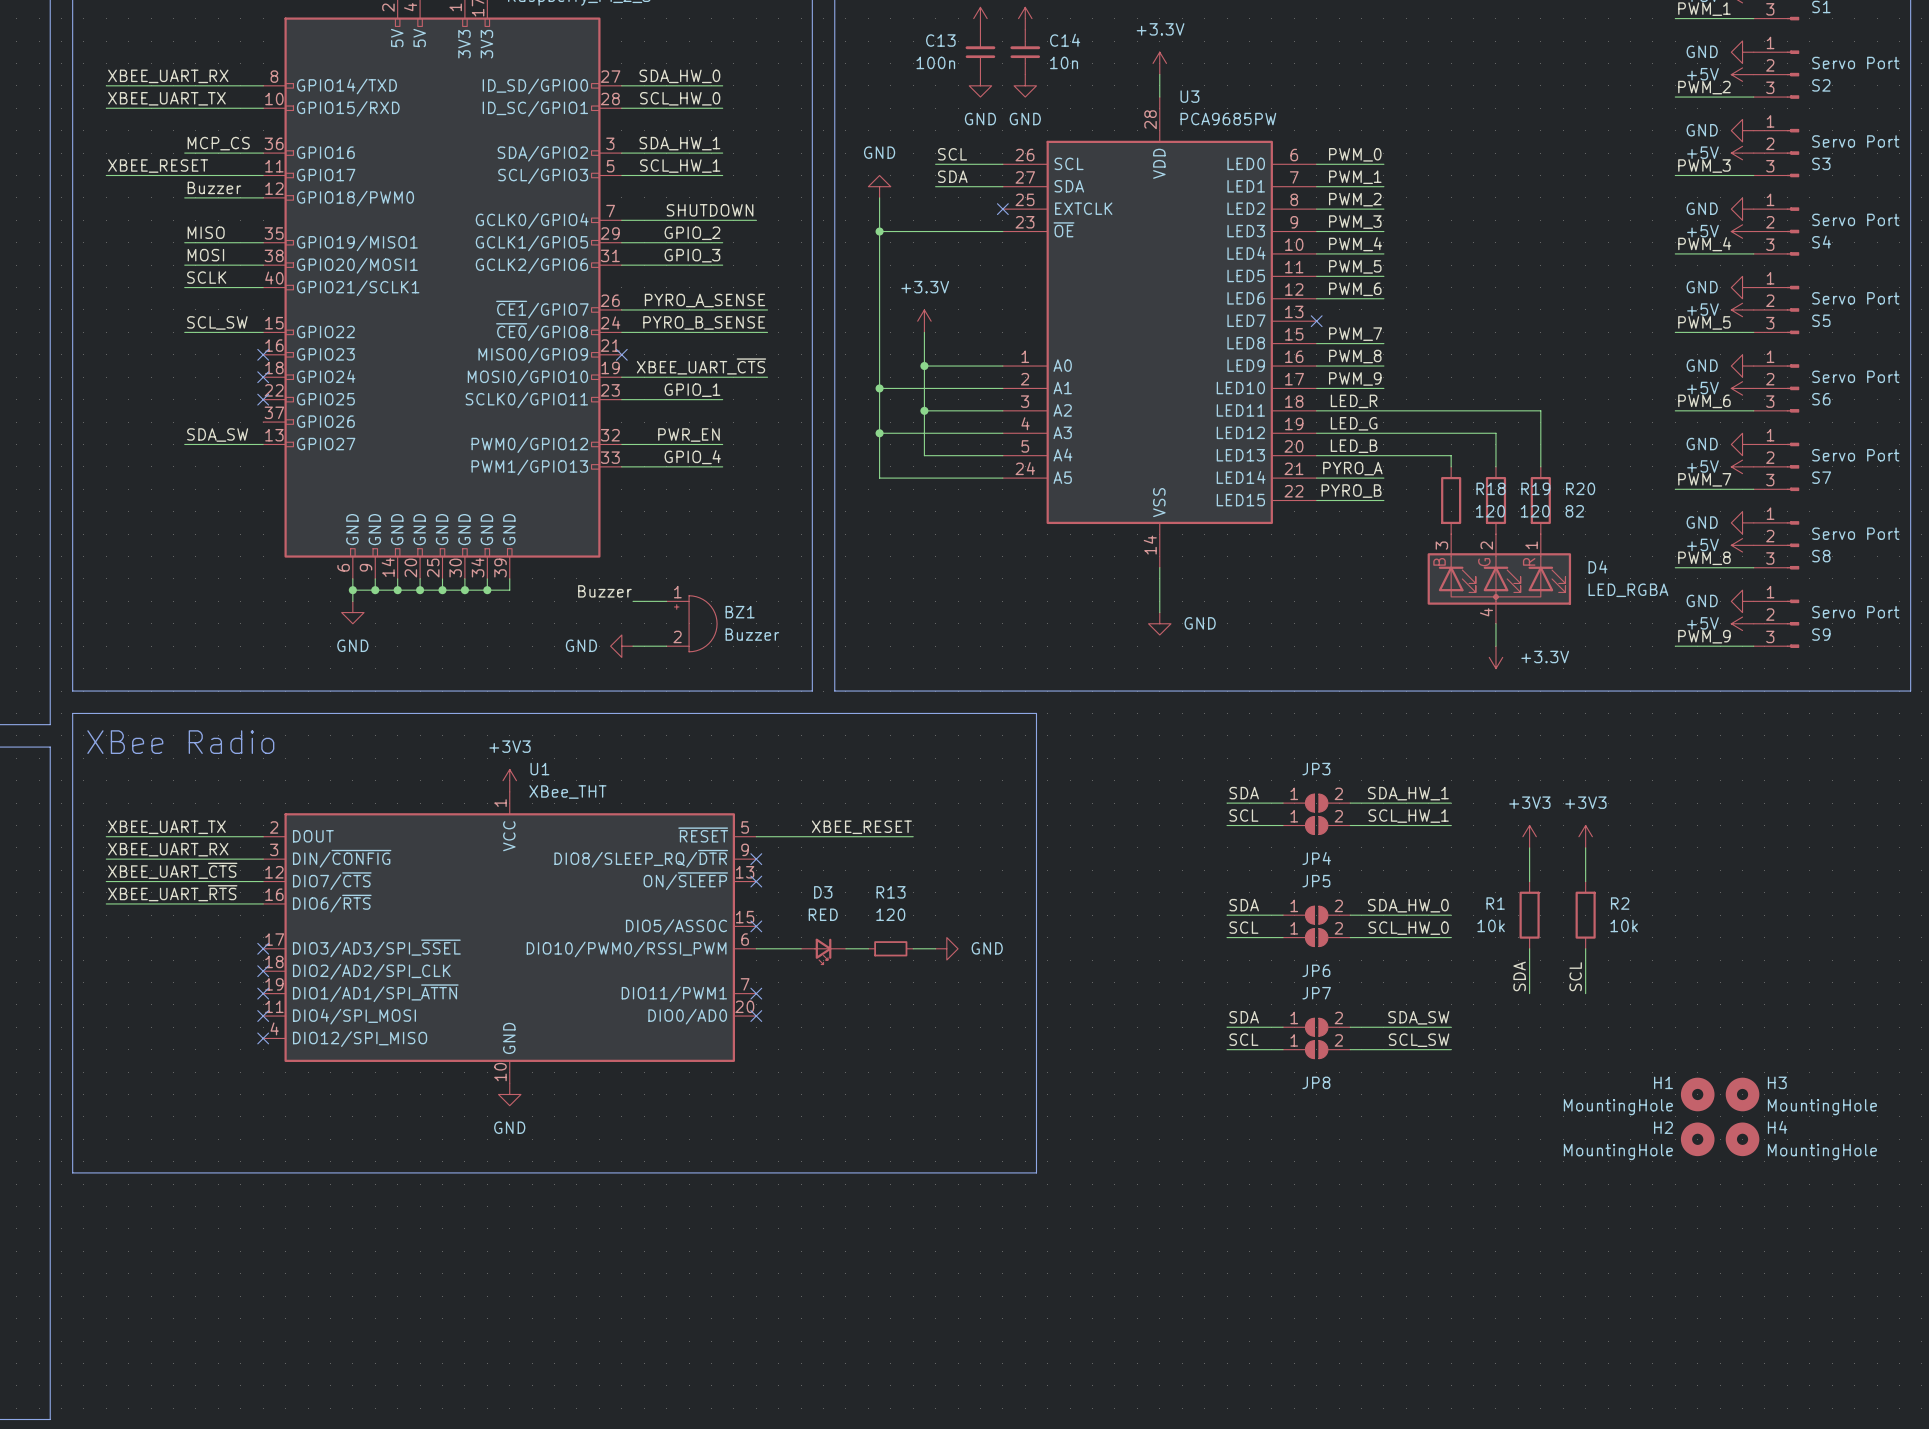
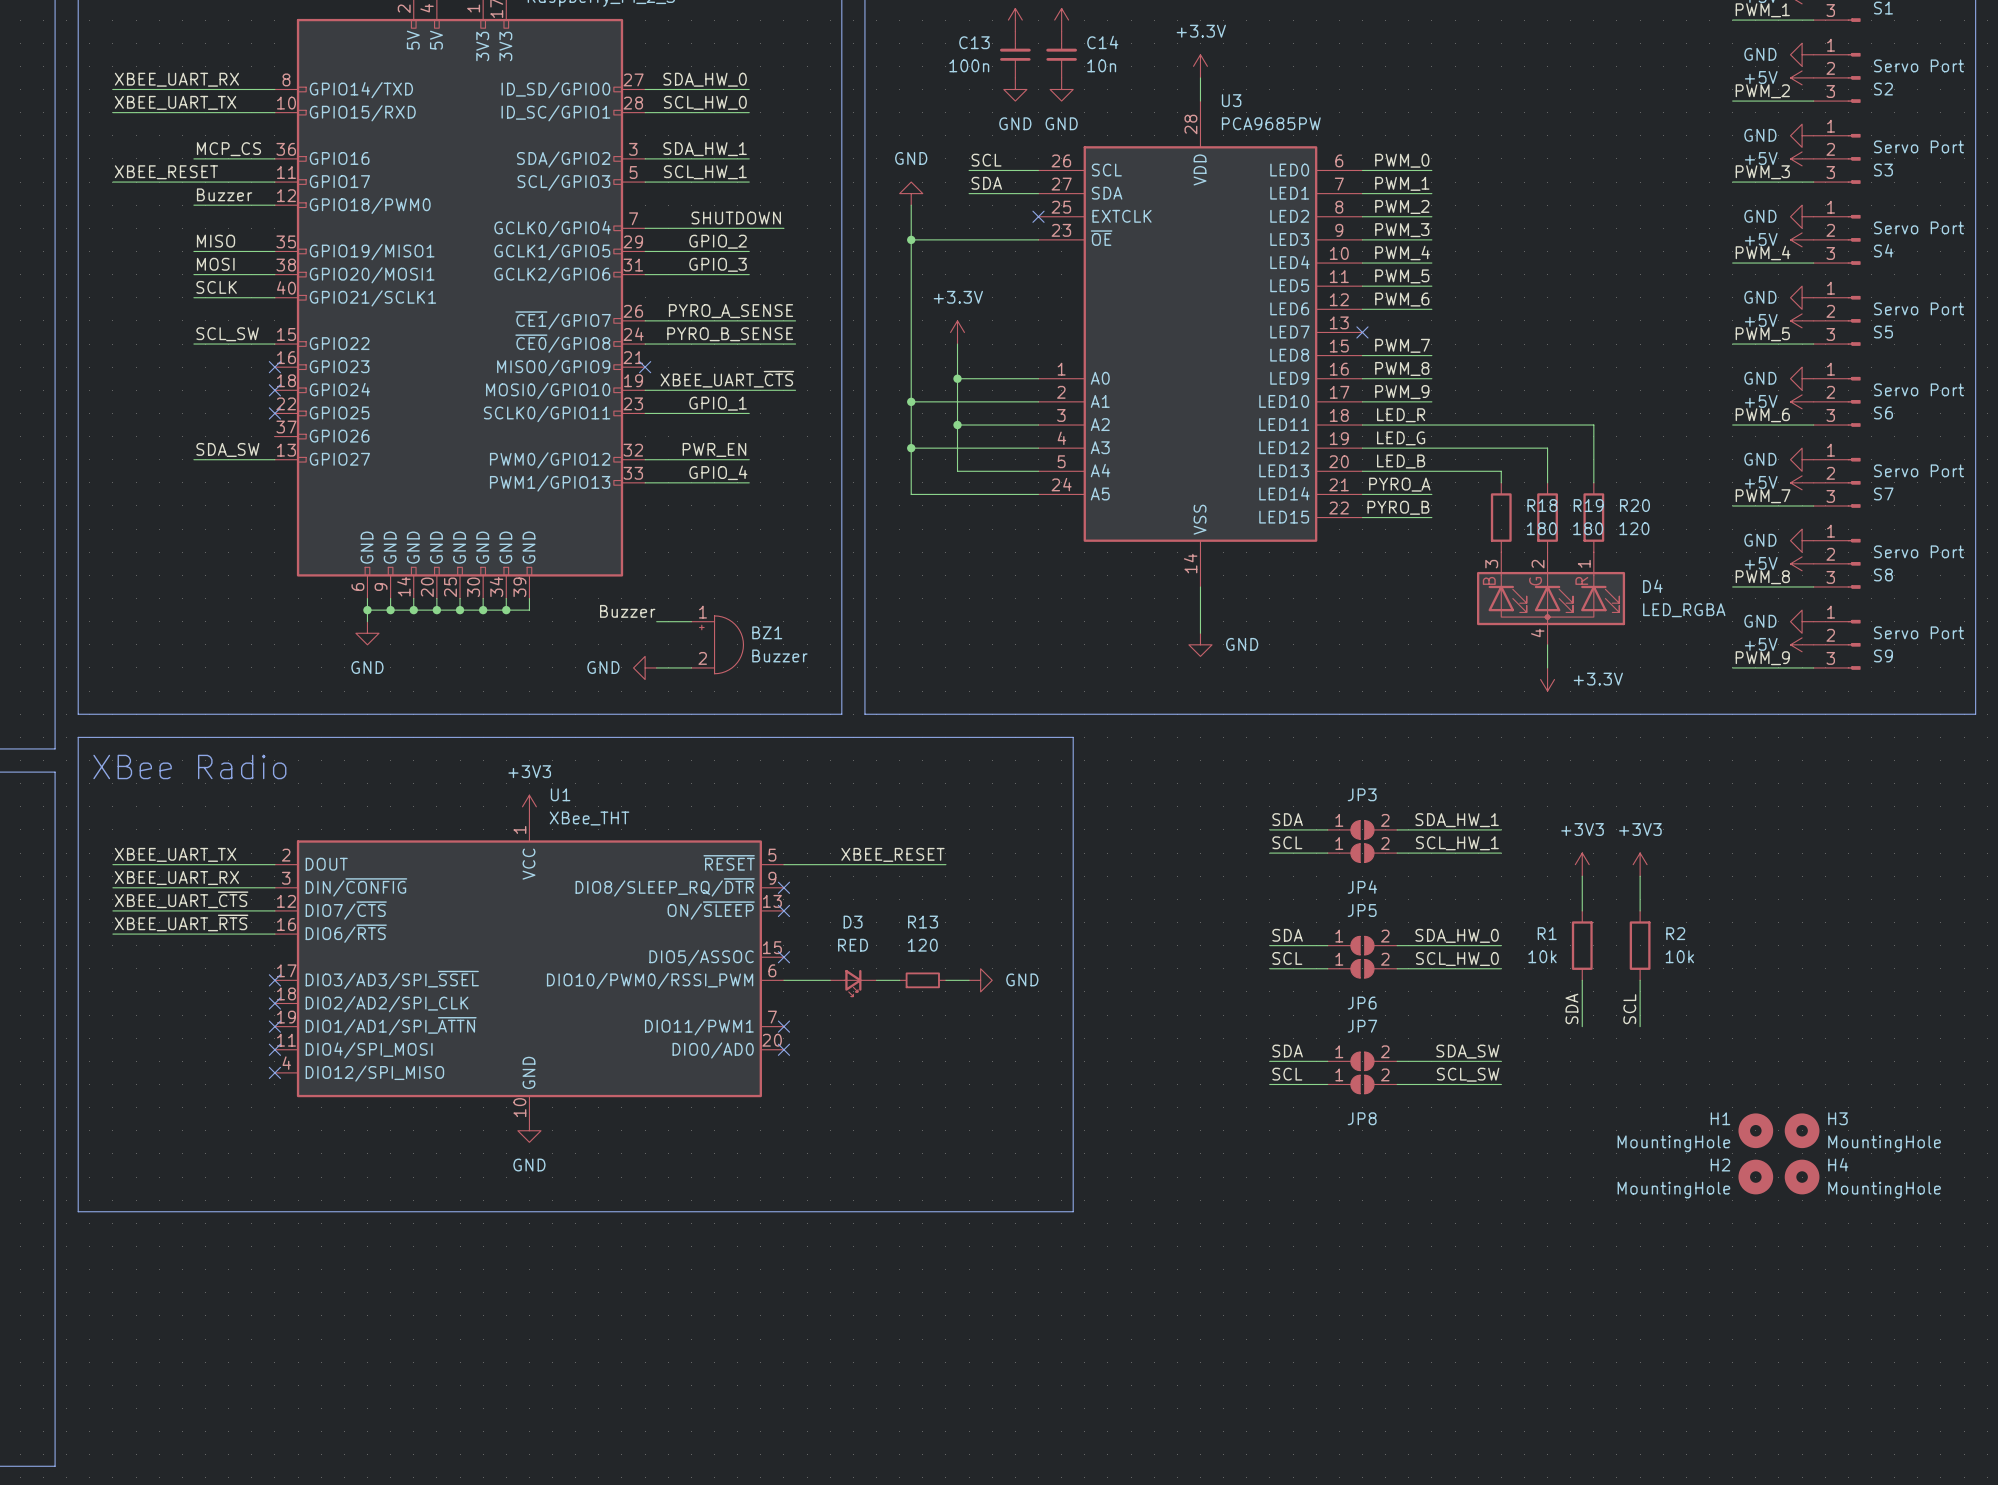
R18 value: 120 (1490, 511) -> 180 (1541, 528)
R19 value: 120 (1535, 511) -> 180 (1588, 528)
R20 value: 82 (1574, 511) -> 120 (1634, 528)

